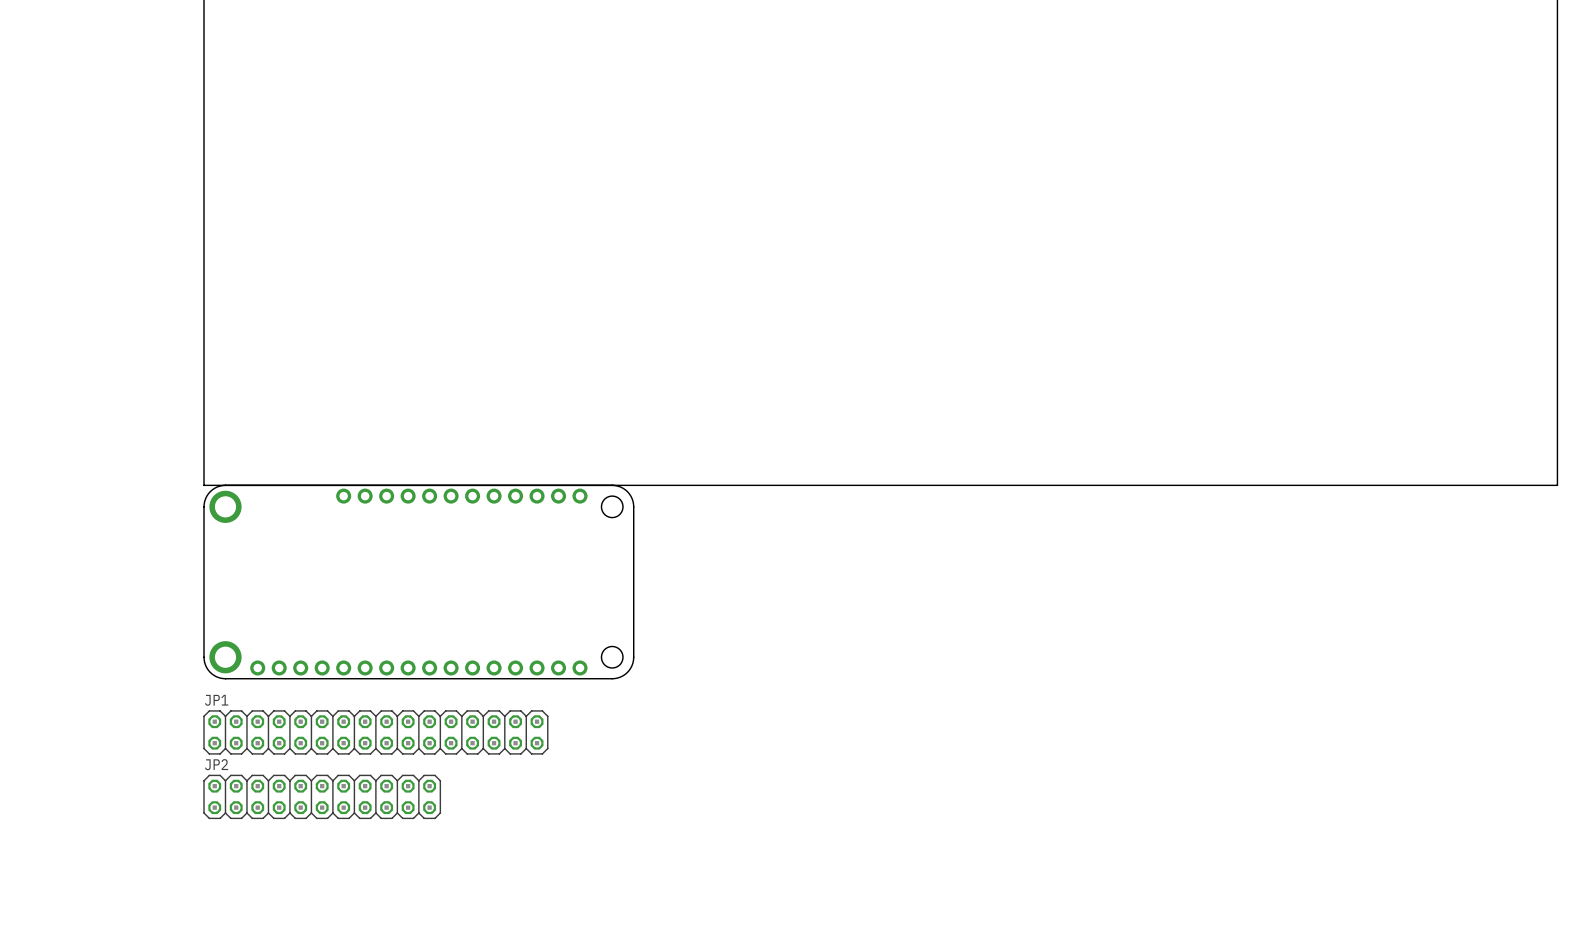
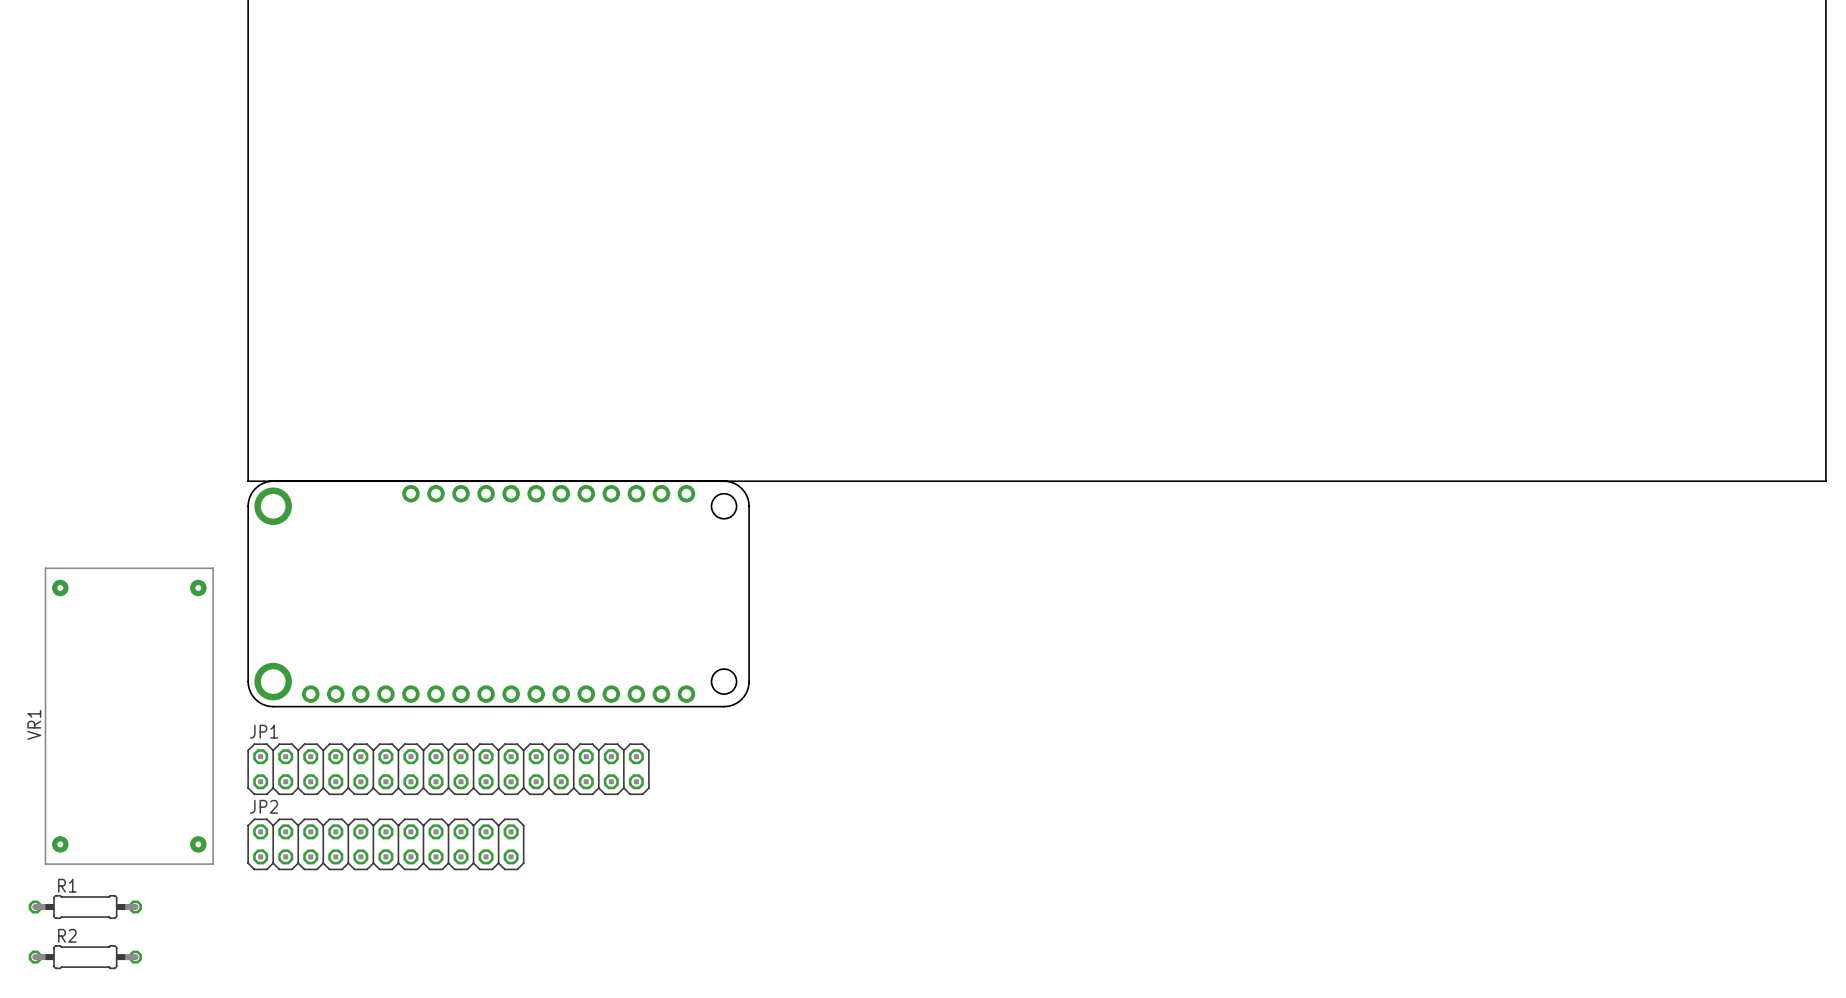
VR1: none -> (129, 716)
R1: none -> (85, 907)
R2: none -> (85, 957)

